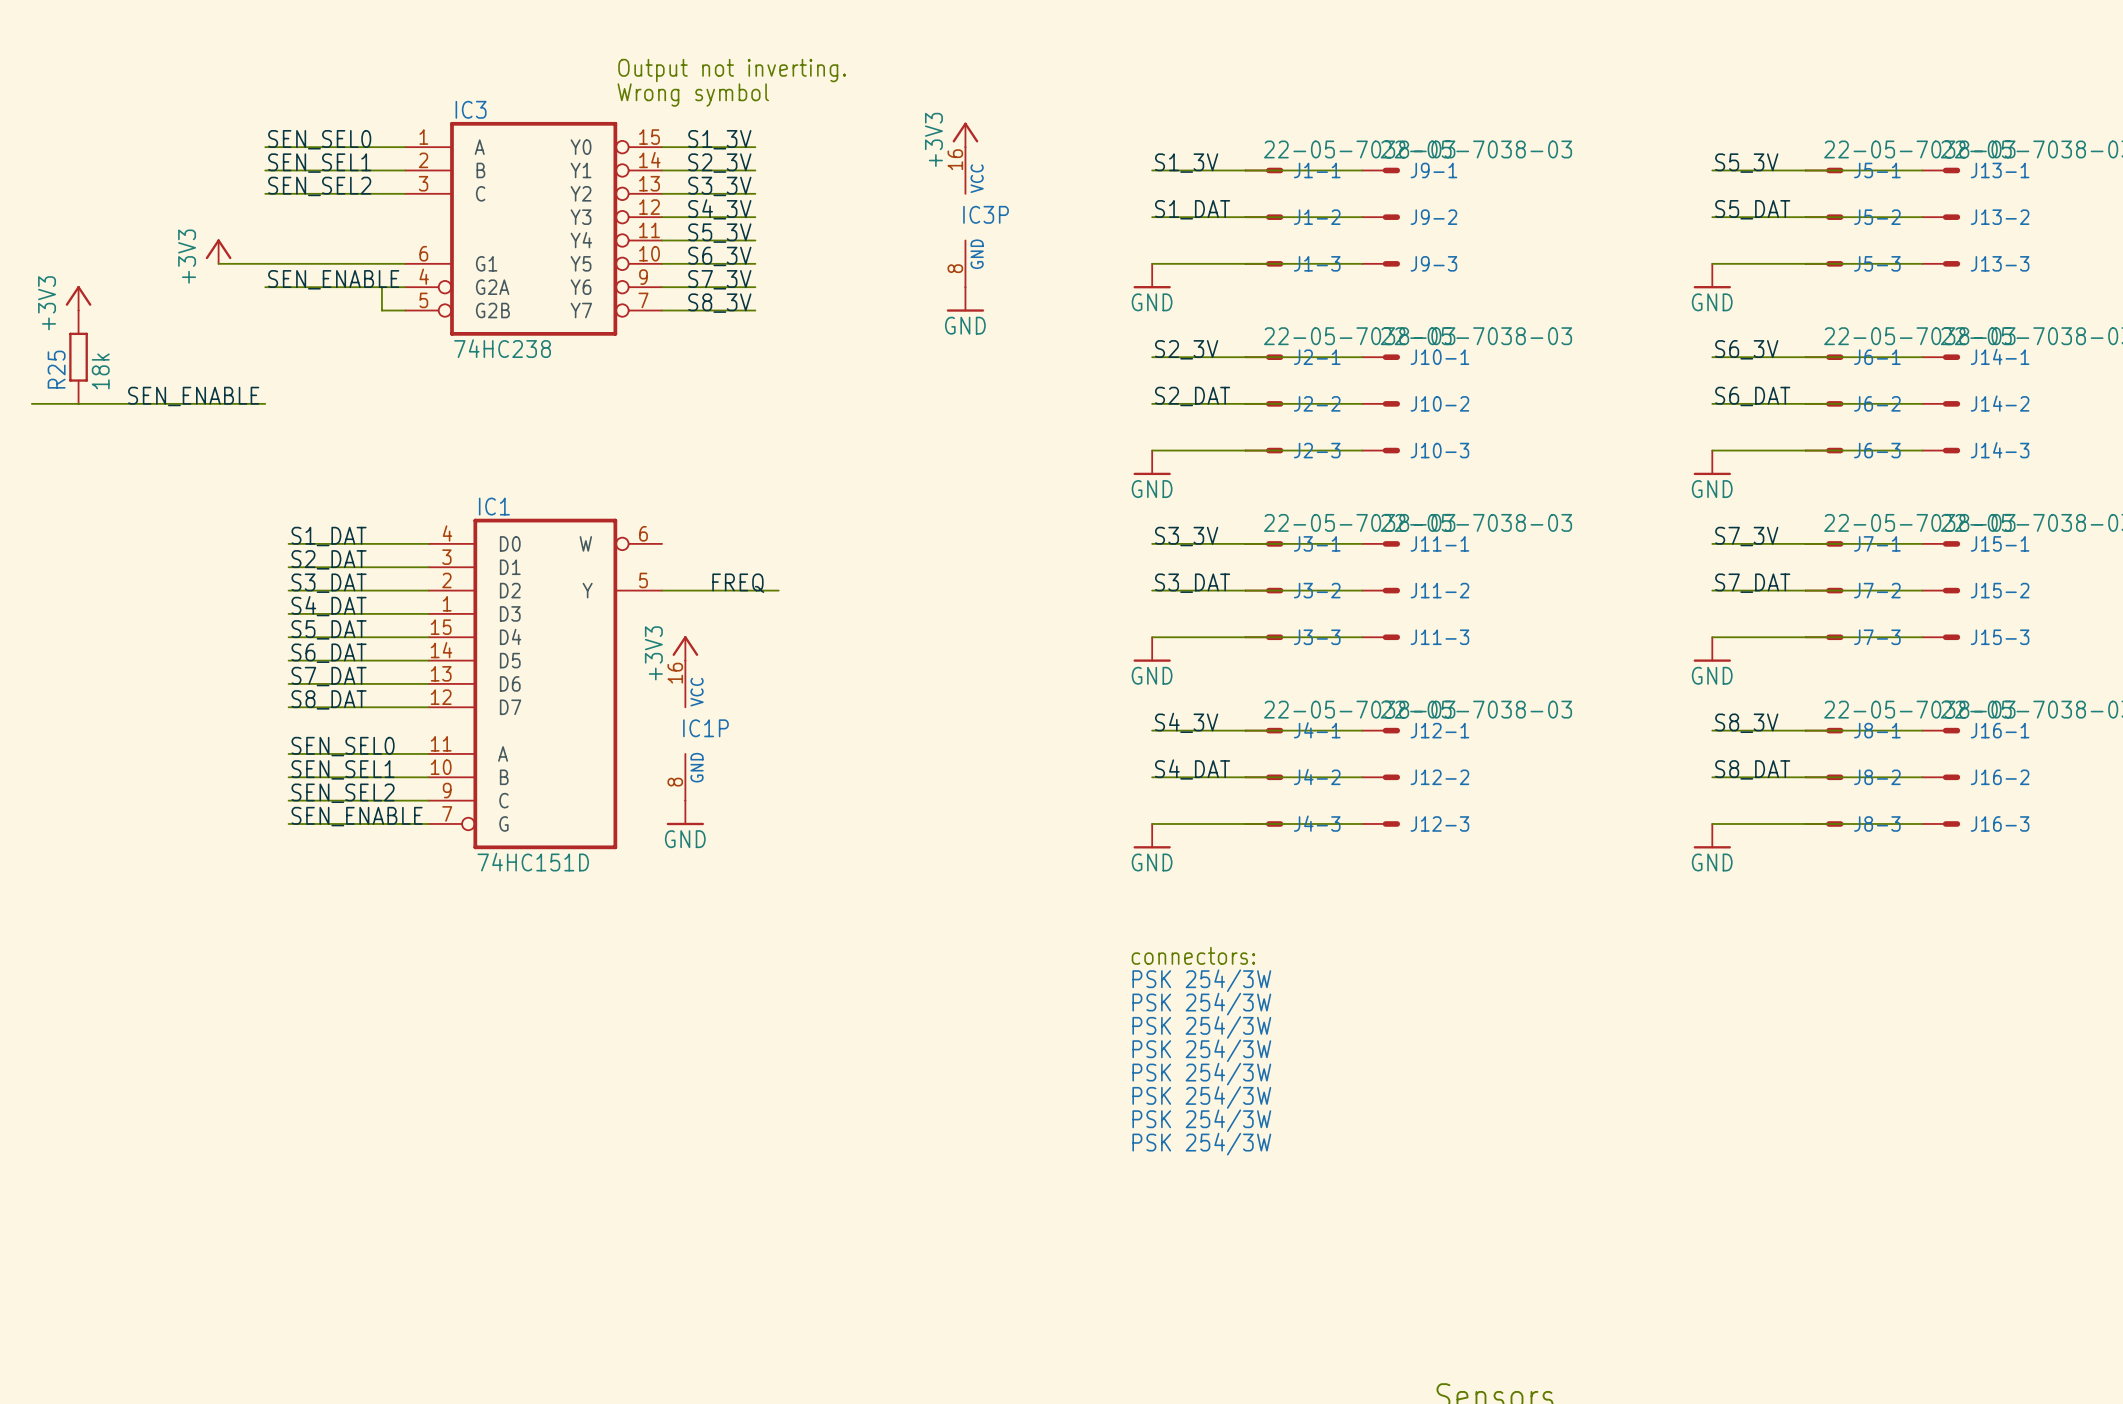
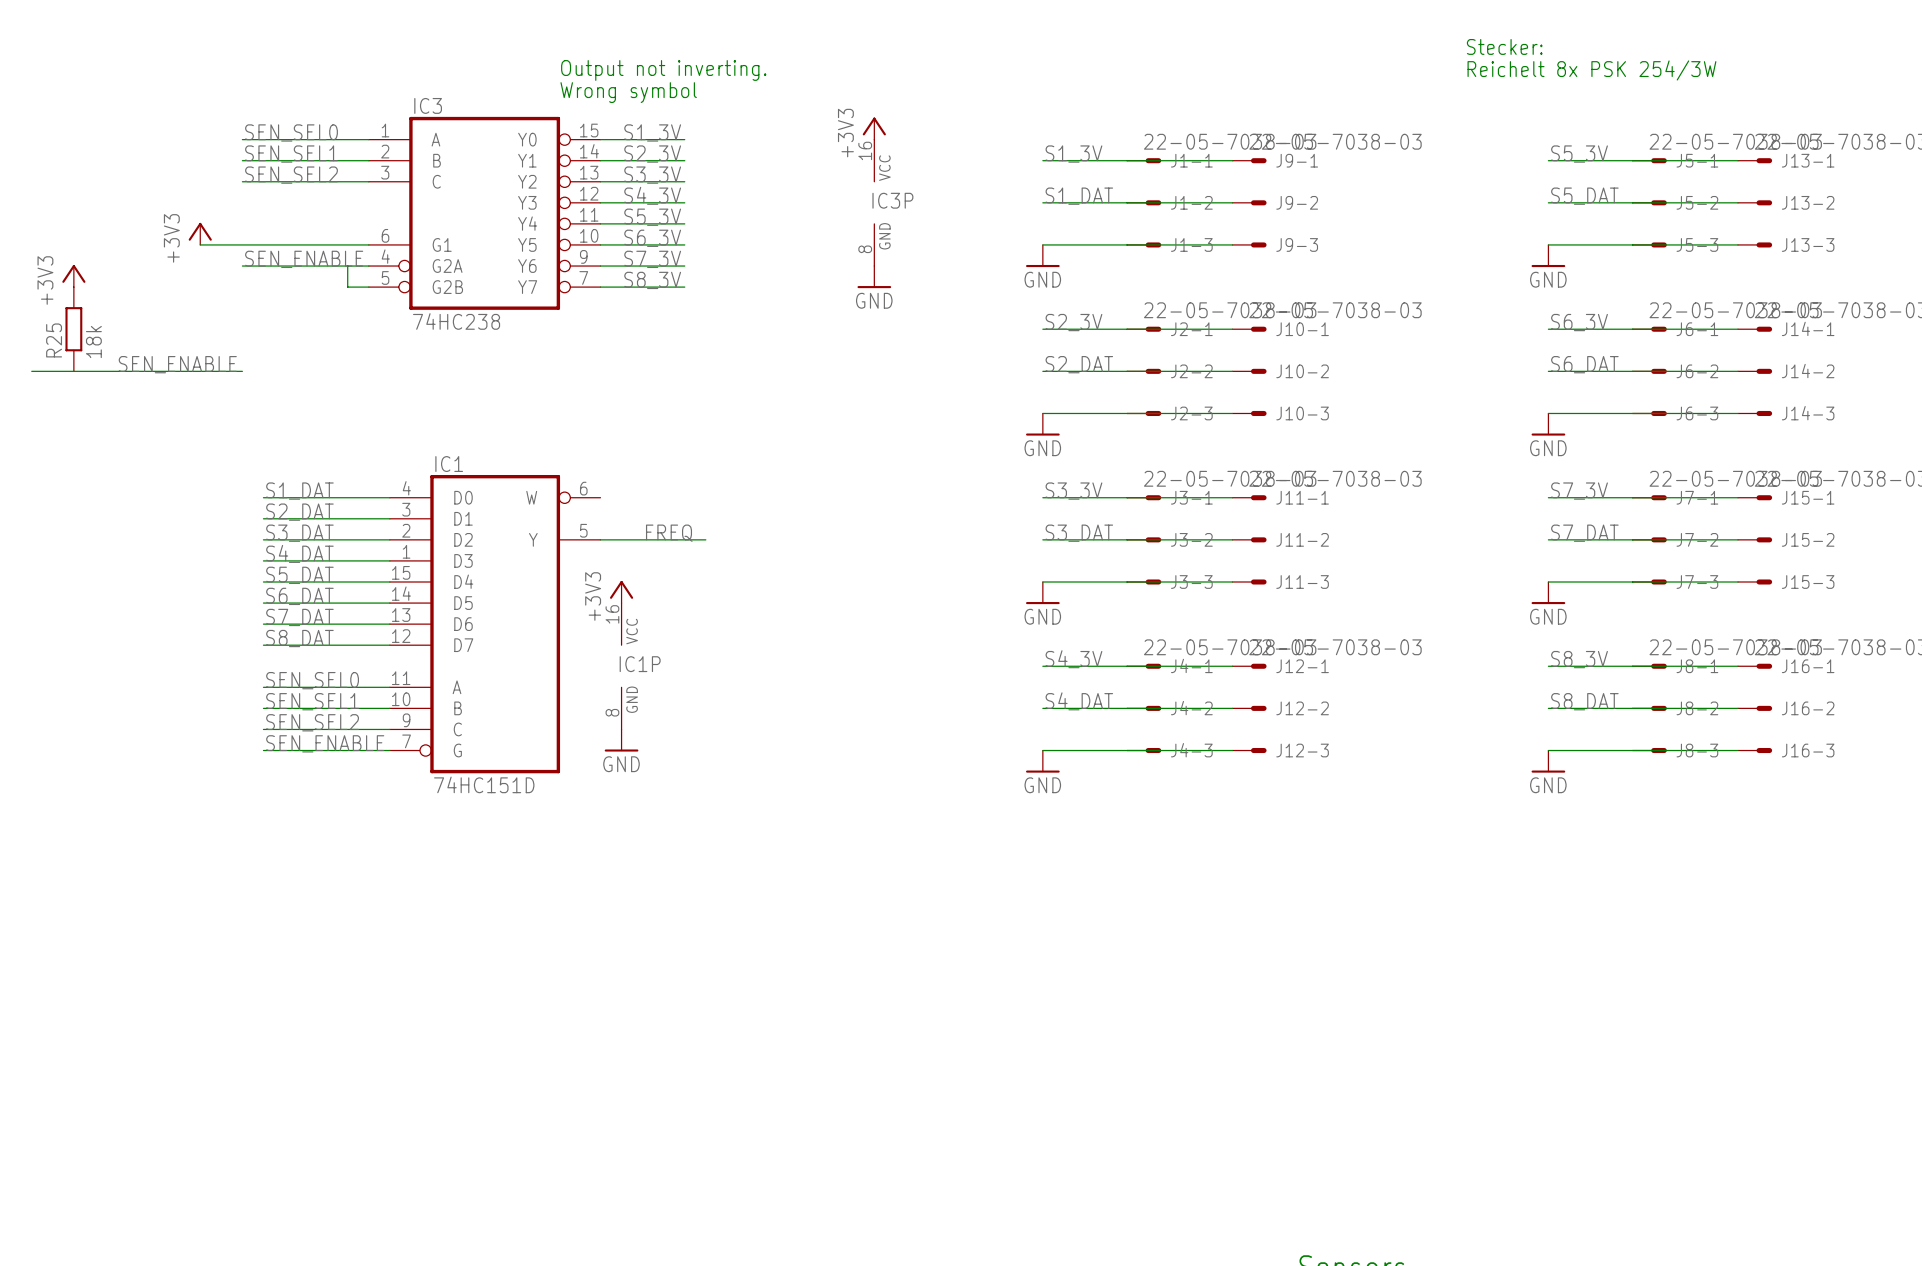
text: none -> Stecker: (1504, 46)
text: none -> Reichelt 8x PSK 254/3W (1591, 70)
text: connectors: (1193, 955) -> none
part: PSK 254/3W (1201, 980) -> none
part: PSK 254/3W (1201, 1004) -> none
part: PSK 254/3W (1201, 1027) -> none
part: PSK 254/3W (1201, 1050) -> none
part: PSK 254/3W (1201, 1074) -> none
part: PSK 254/3W (1201, 1097) -> none
part: PSK 254/3W (1201, 1120) -> none
part: PSK 254/3W (1201, 1144) -> none

